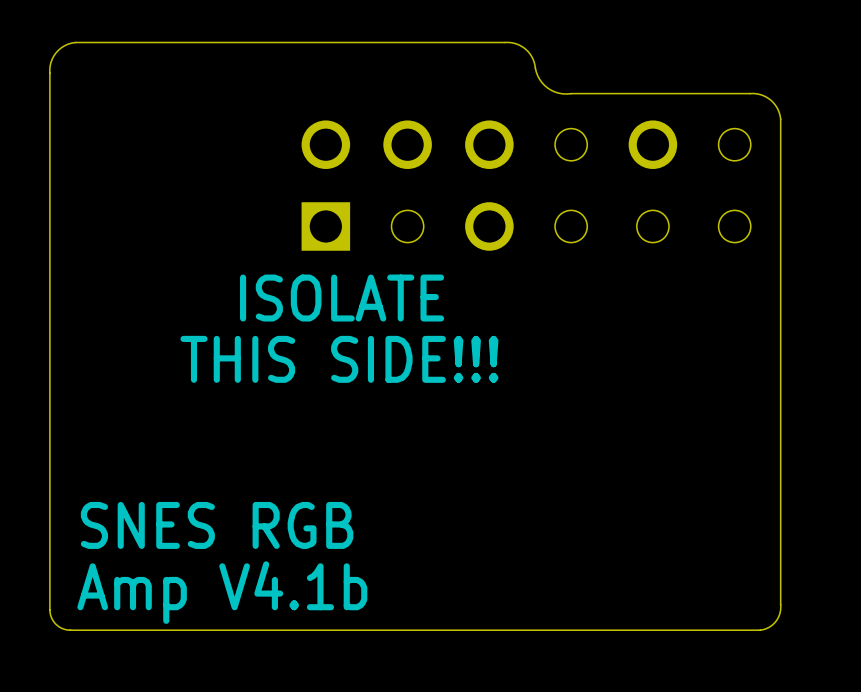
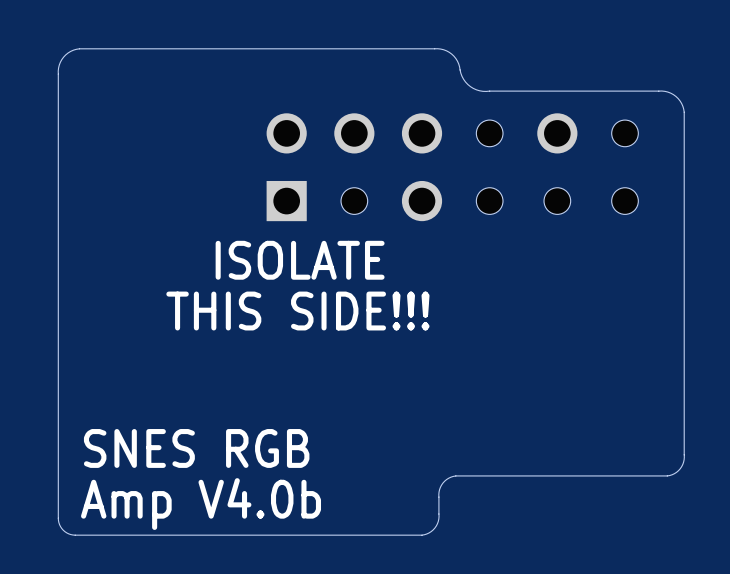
board edge: (750, 93) (760, 94) (770, 100) (777, 108) (780, 119) (780, 607) (778, 616) (771, 625) (760, 630) (489, 630) -> (637, 91) (661, 91) (670, 93) (680, 100) (684, 112) (684, 457) (682, 464) (676, 472) (667, 475) (453, 476) (444, 481) (439, 489) (438, 519) (436, 526) (431, 531) (422, 535)
text: Amp V4.1b (222, 592) -> Amp V4.0b (201, 504)

